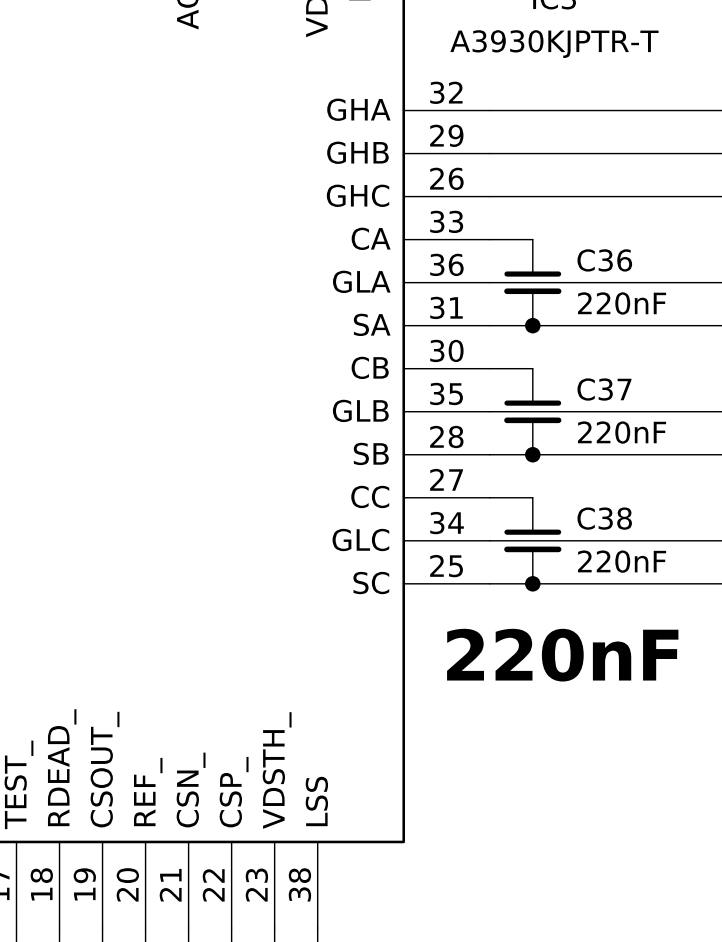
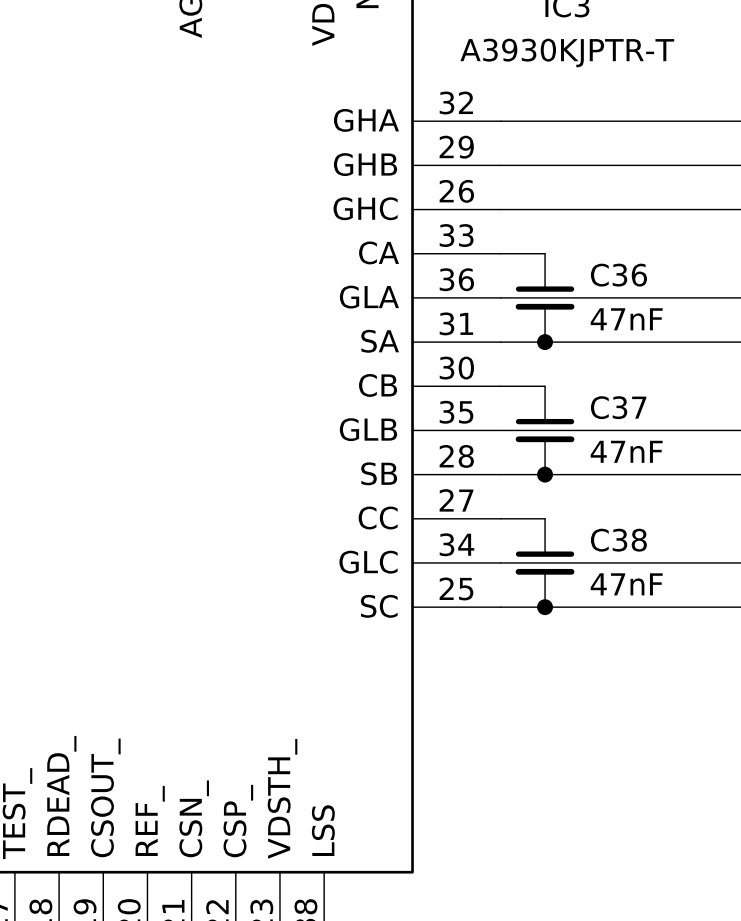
C36 value: 220nF (622, 303) -> 47nF (626, 319)
C37 value: 220nF (622, 432) -> 47nF (626, 451)
C38 value: 220nF (622, 561) -> 47nF (626, 584)
text: 220nF (562, 655) -> none

